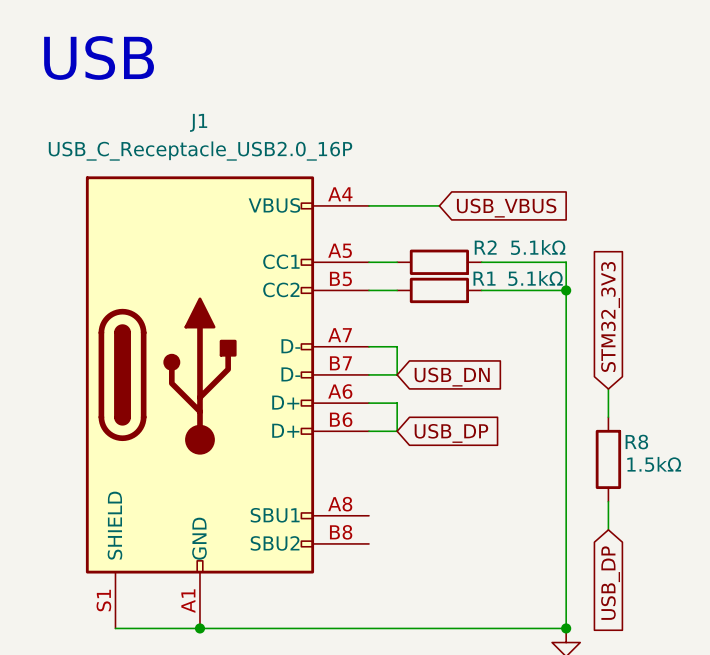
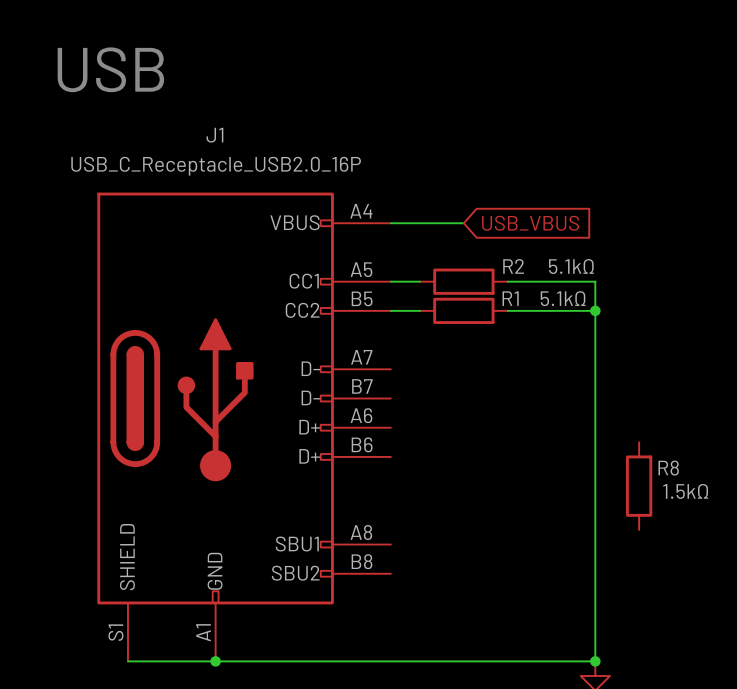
global label: STM32_3V3 (610, 316) -> none
wire: (368, 346) (397, 346) (397, 374) (368, 374) -> none
global label: USB_DN (452, 377) -> none
wire: (608, 389) (608, 417) -> none
wire: (368, 403) (397, 403) (397, 431) (368, 431) -> none
global label: USB_DP (451, 433) -> none
wire: (608, 501) (608, 529) -> none
global label: USB_DP (610, 583) -> none

